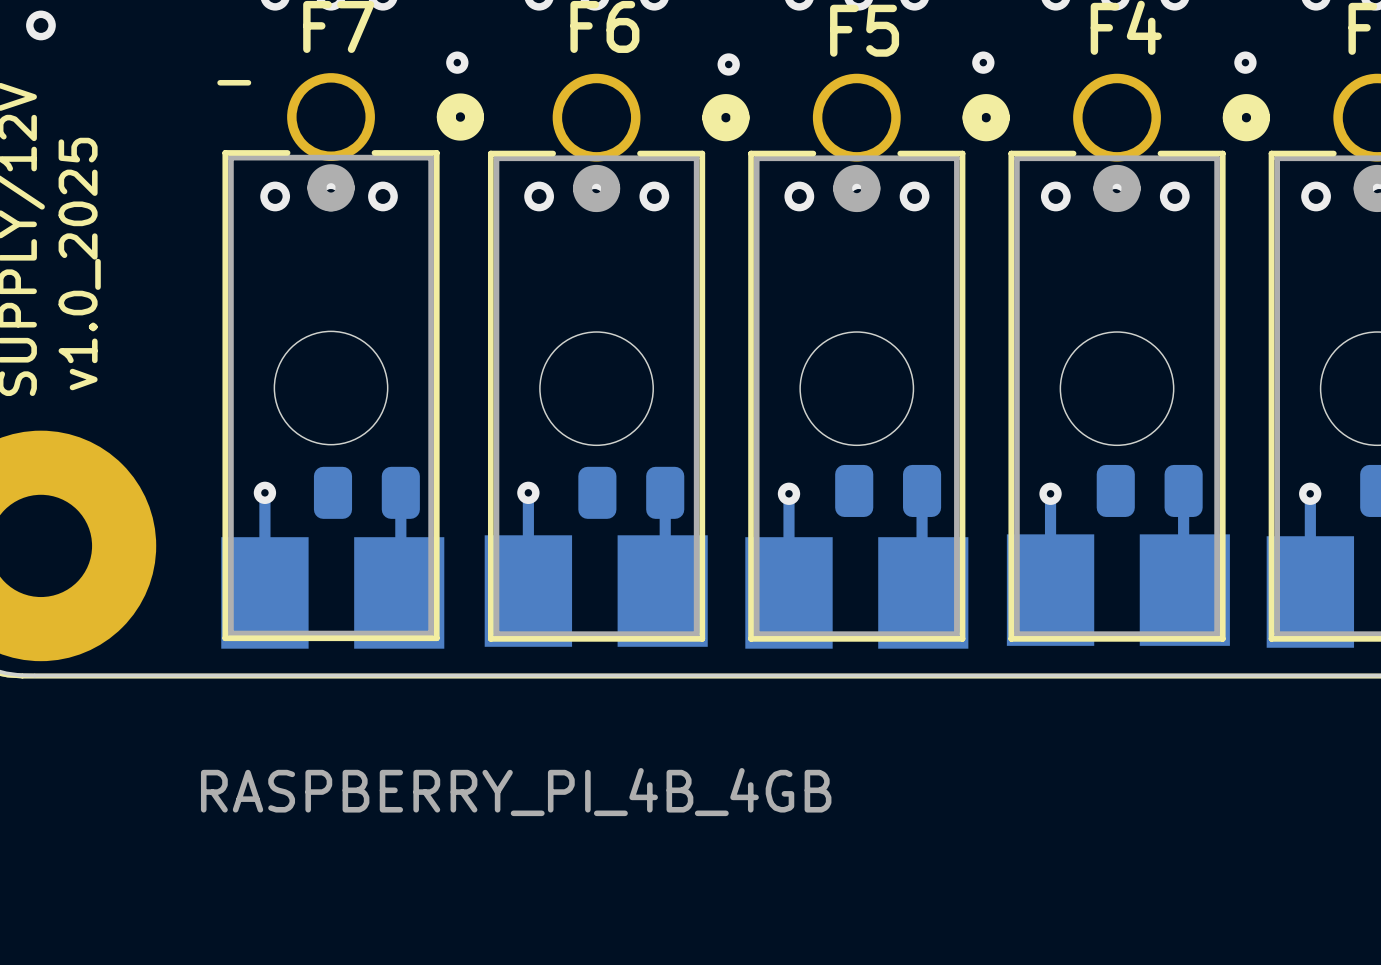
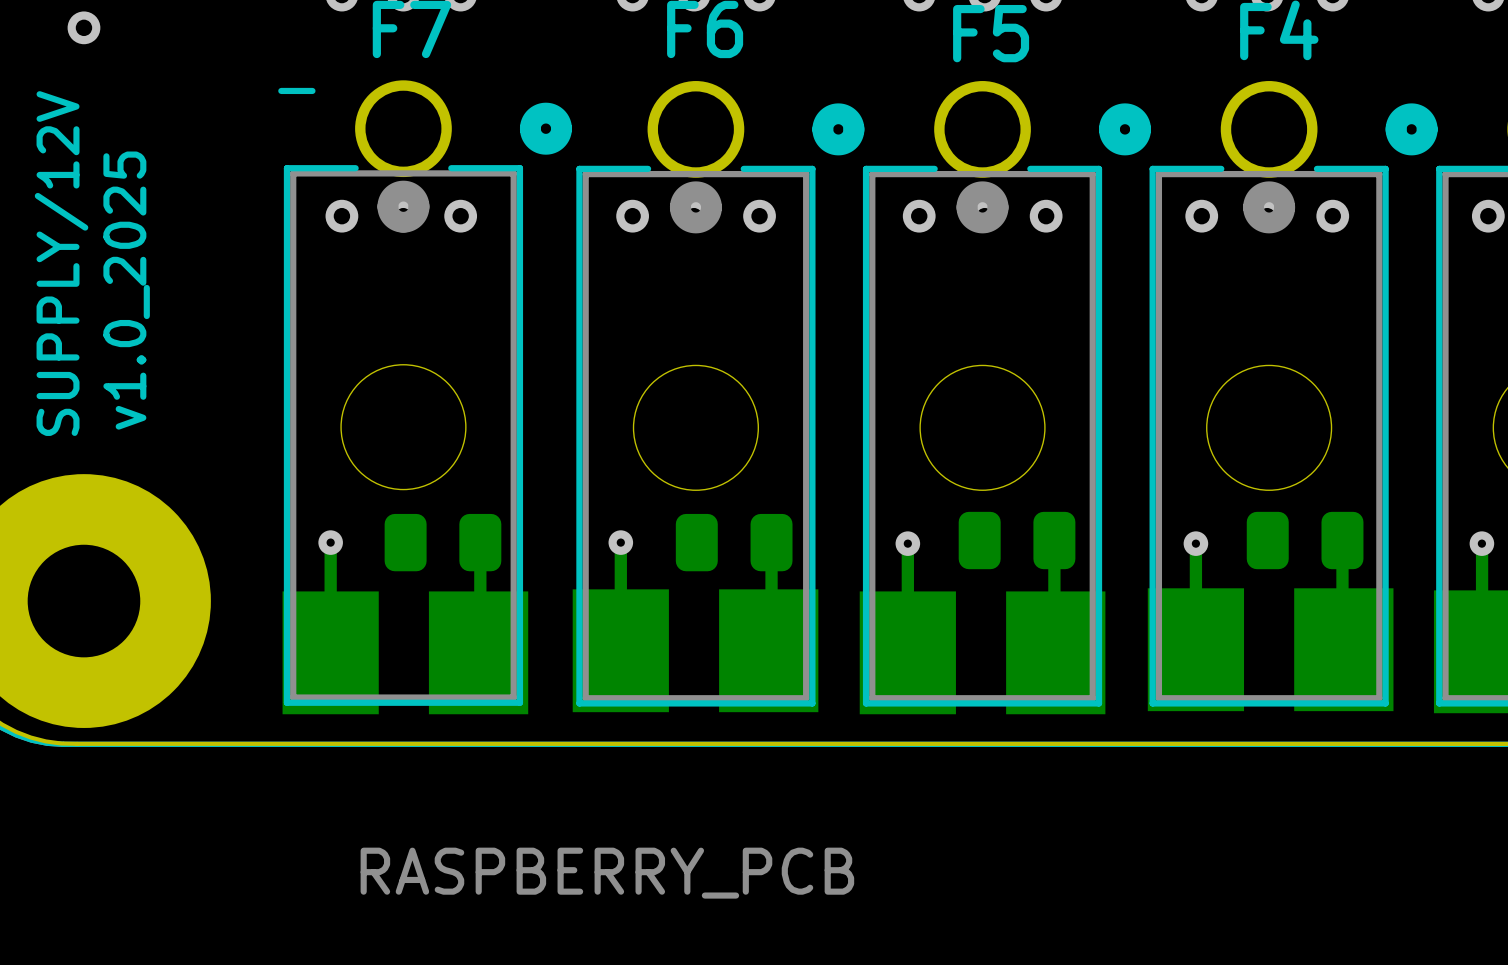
via: (457, 62) -> none
via: (983, 62) -> none
via: (1245, 62) -> none
via: (728, 64) -> none
part value: RASPBERRY_PI_4B_4GB (516, 792) -> RASPBERRY_PCB (607, 873)

